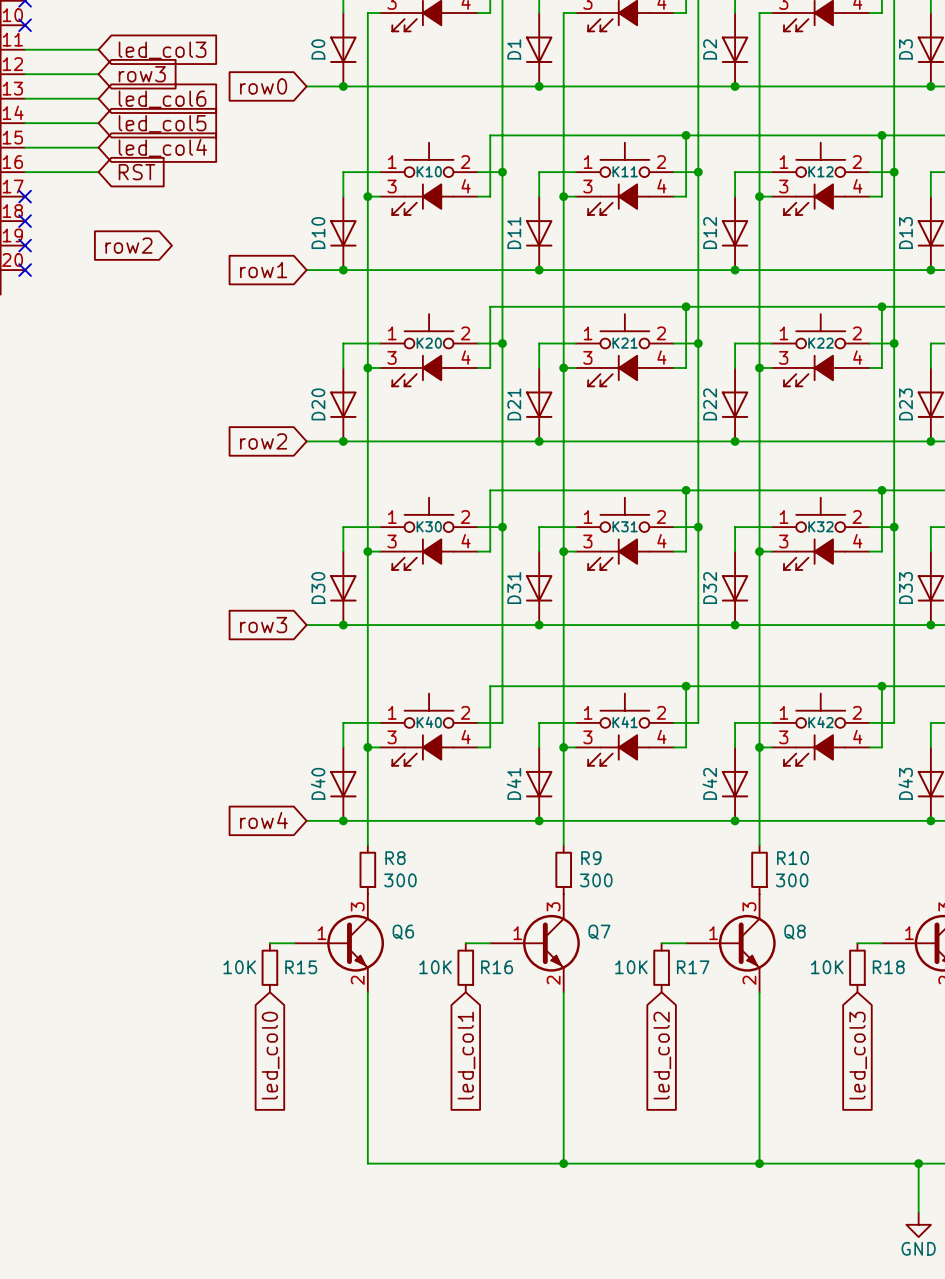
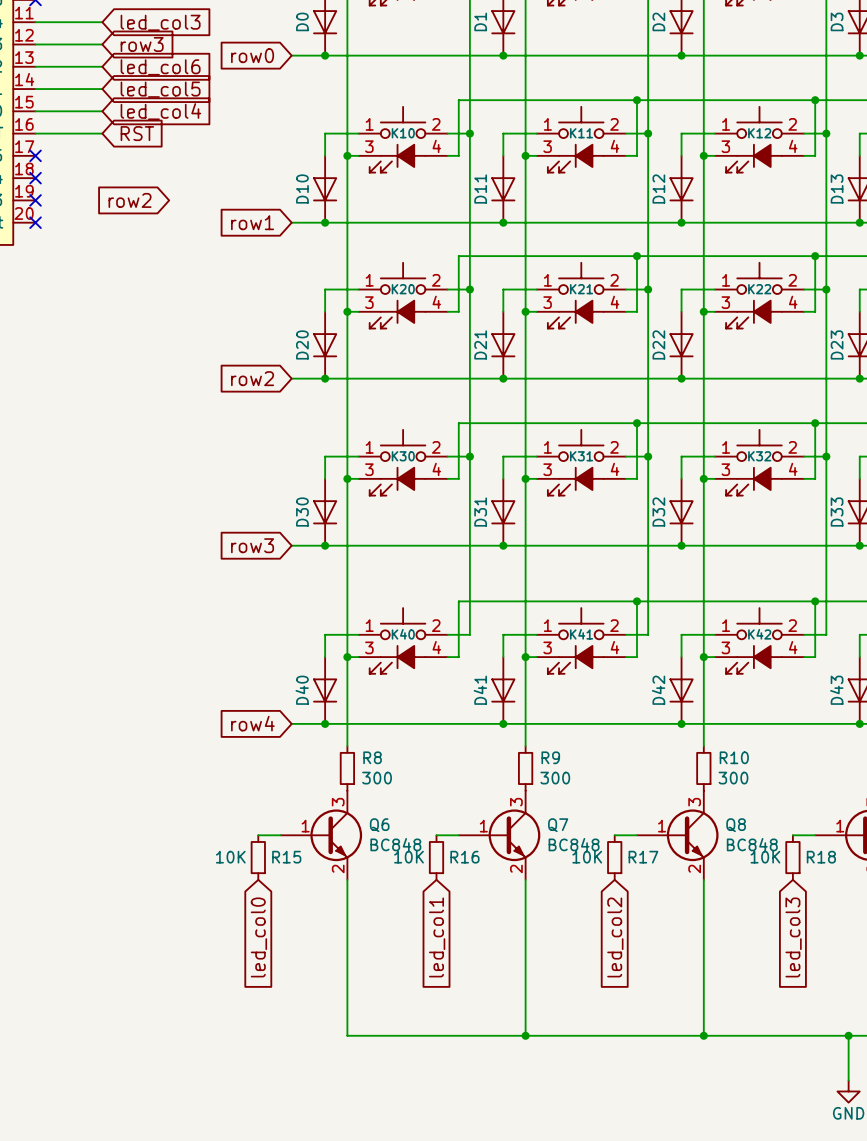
Q6 value: none -> BC848 (395, 844)
Q7 value: none -> BC848 (574, 844)
Q8 value: none -> BC848 (752, 844)

